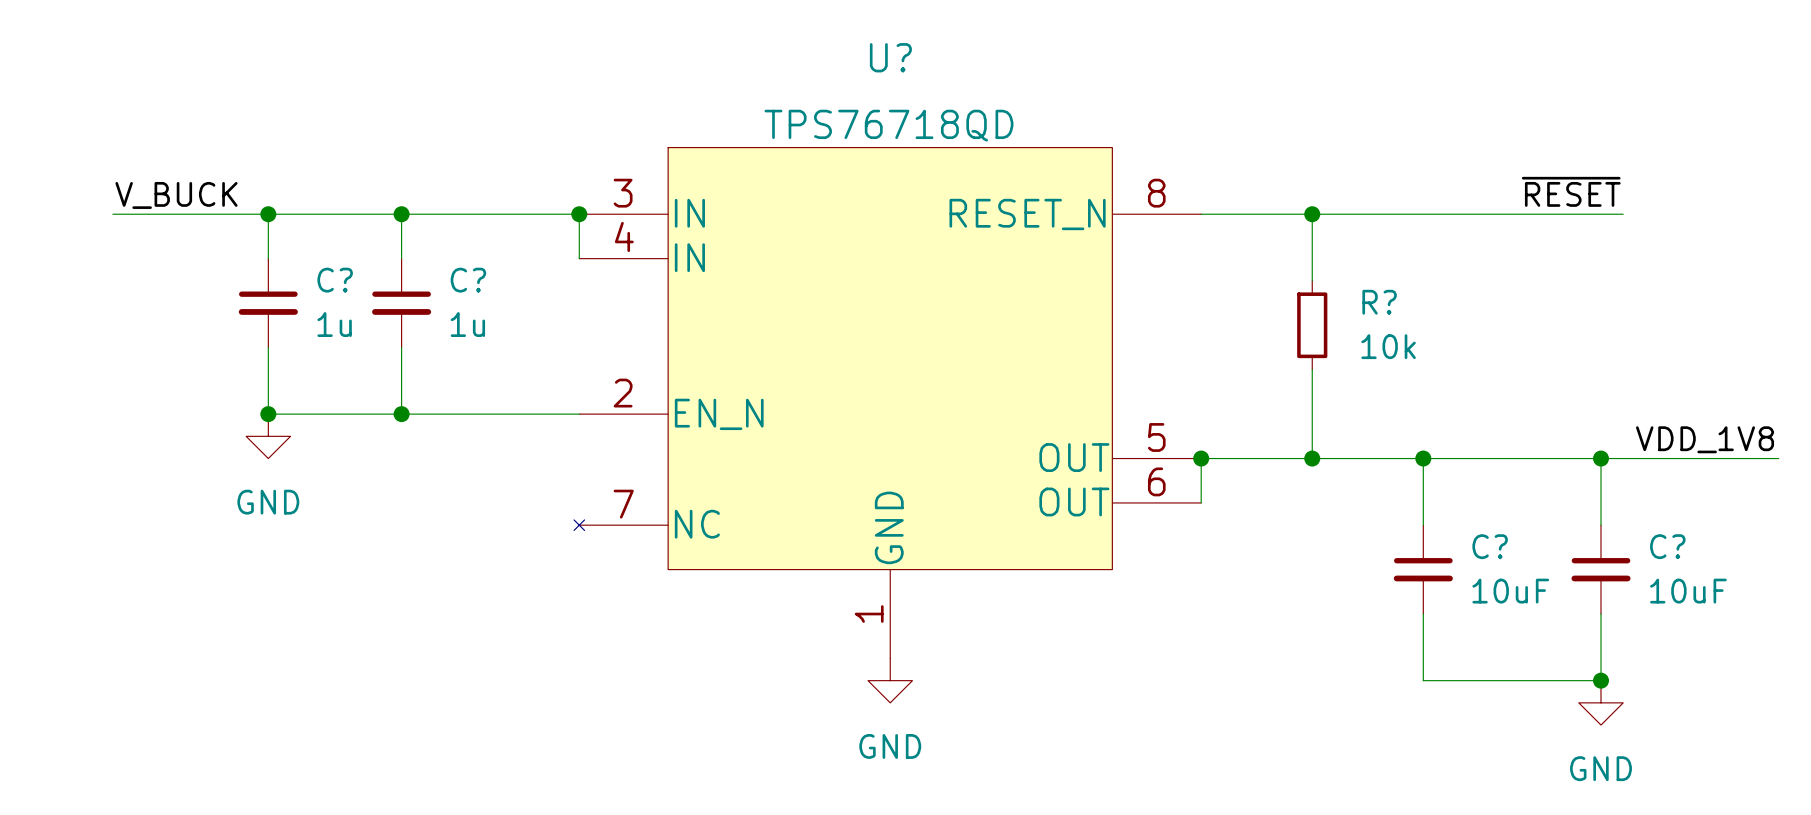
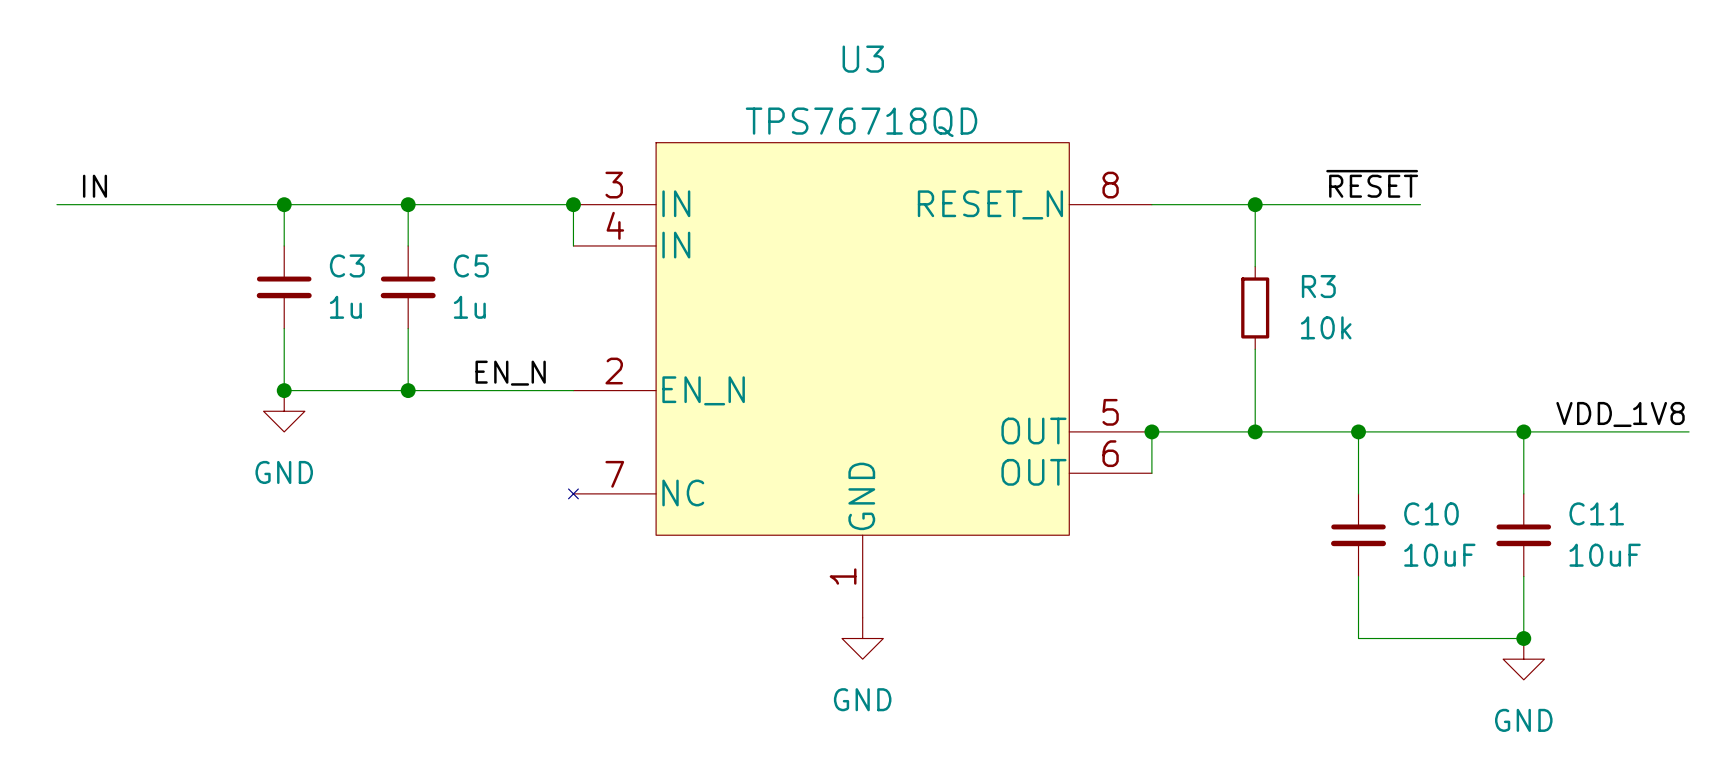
U? name: U? (890, 57) -> U3 (863, 59)
label position: ~{RESET} (1571, 191) -> ~{RESET} (1372, 183)
label: none -> IN (94, 186)
label: V_BUCK (176, 195) -> none
wire: none -> (56, 204) (139, 204)
wire: (1489, 214) (1623, 214) -> none
C? name: C? (335, 280) -> C3 (347, 265)
C? name: C? (468, 280) -> C5 (471, 265)
R? name: R? (1379, 302) -> R3 (1318, 286)
label: none -> EN_N (510, 373)
C? name: C? (1490, 546) -> C10 (1431, 513)
C? name: C? (1667, 546) -> C11 (1596, 513)

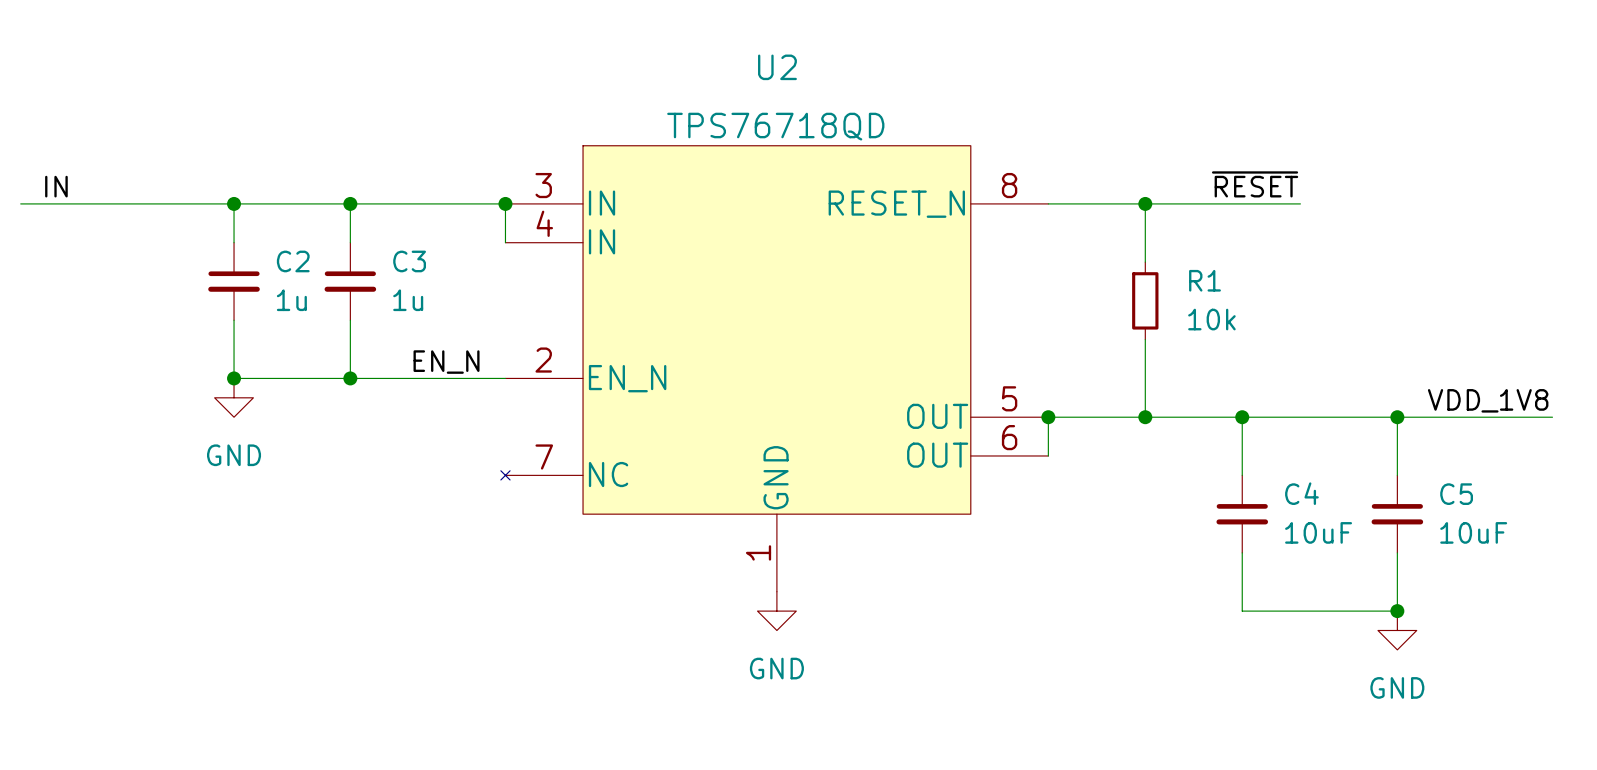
U3 name: U3 (863, 59) -> U2 (777, 67)
C3 name: C3 (347, 265) -> C2 (293, 261)
C5 name: C5 (471, 265) -> C3 (409, 261)
R3 name: R3 (1318, 286) -> R1 (1205, 280)
C10 name: C10 (1431, 513) -> C4 (1301, 493)
C11 name: C11 (1596, 513) -> C5 (1456, 494)

